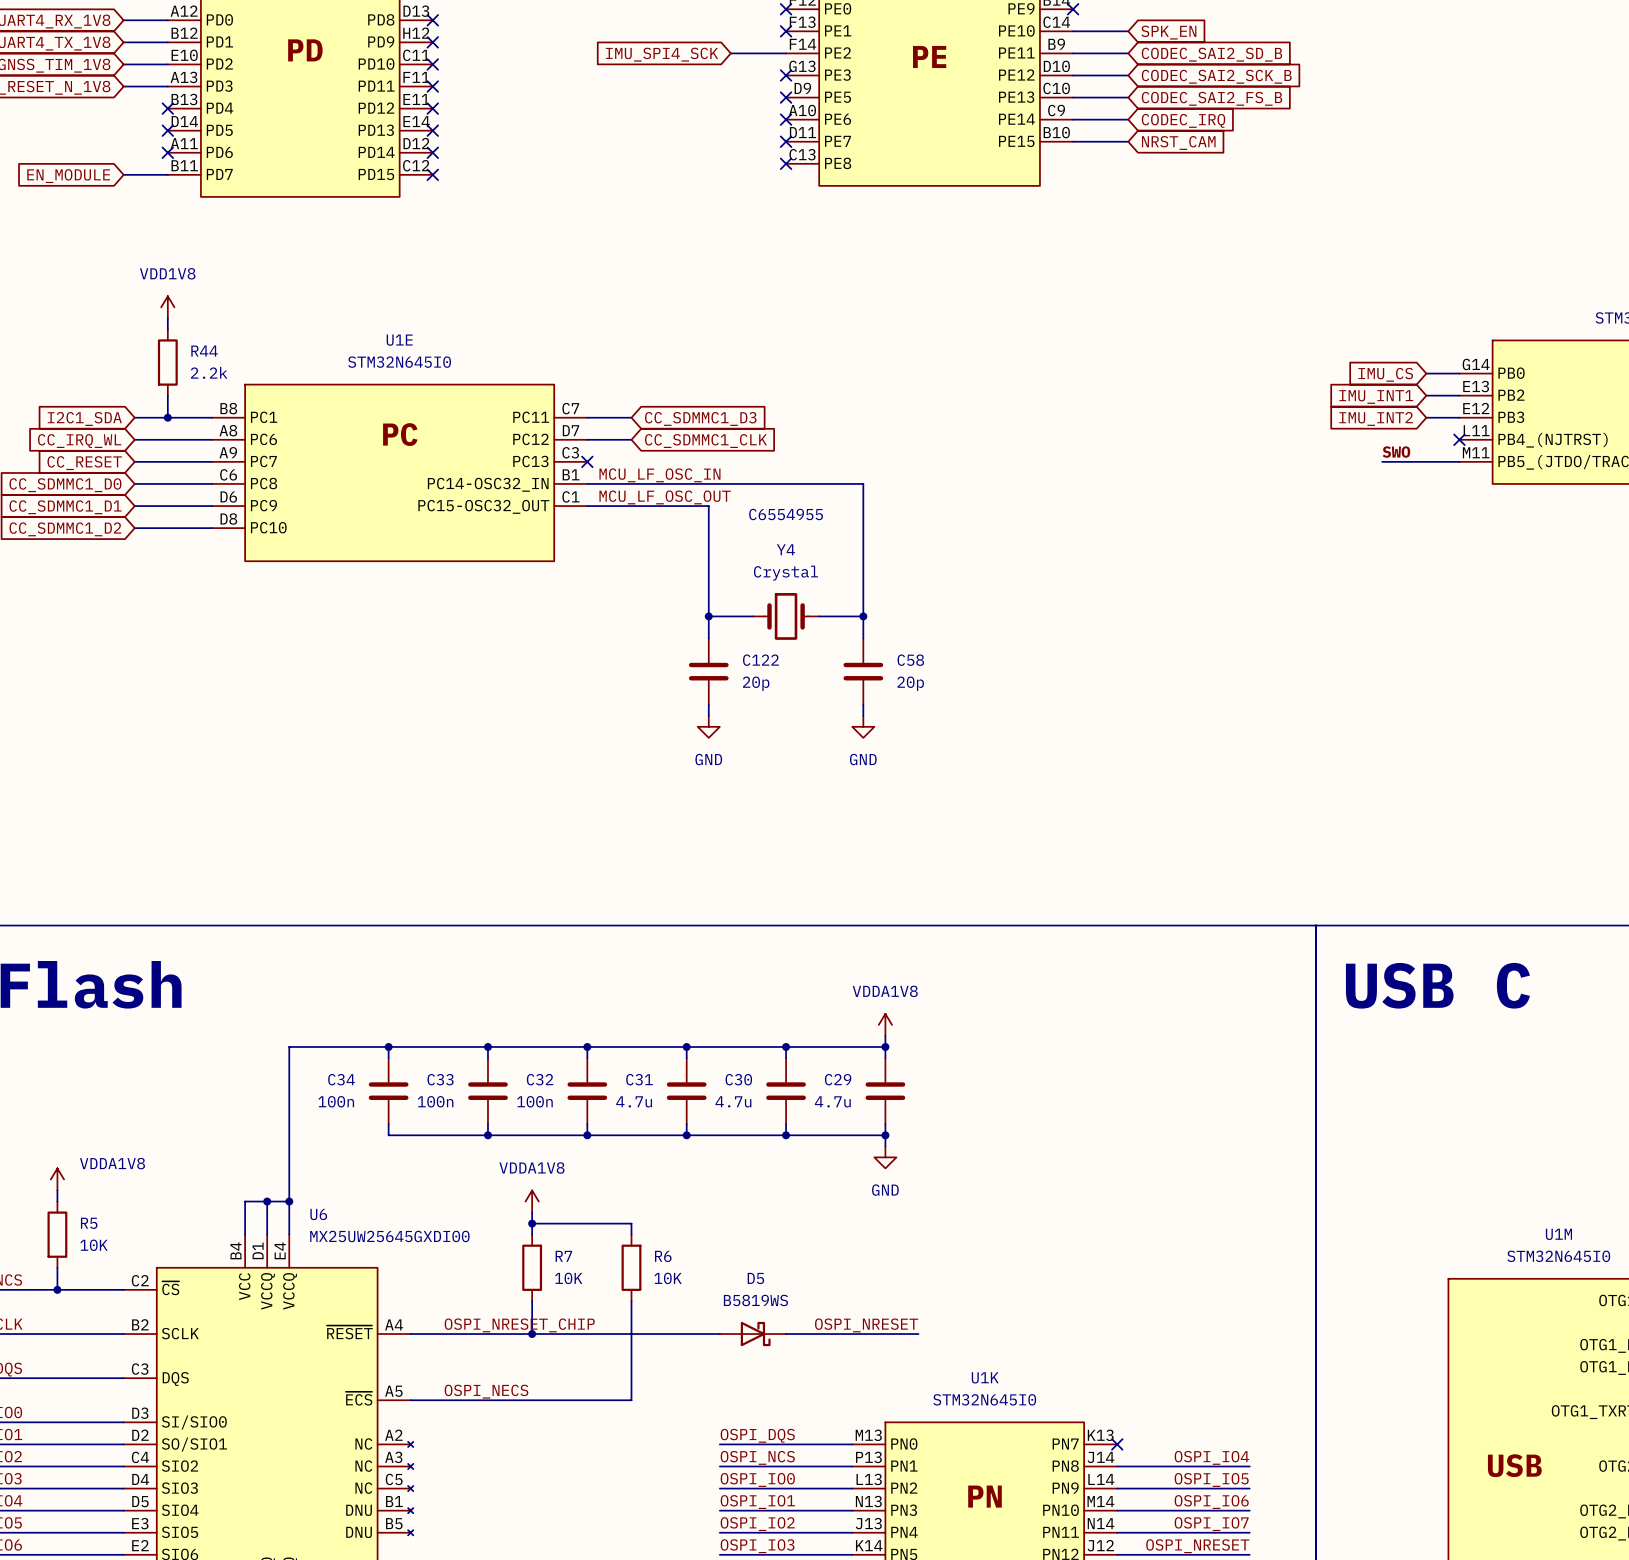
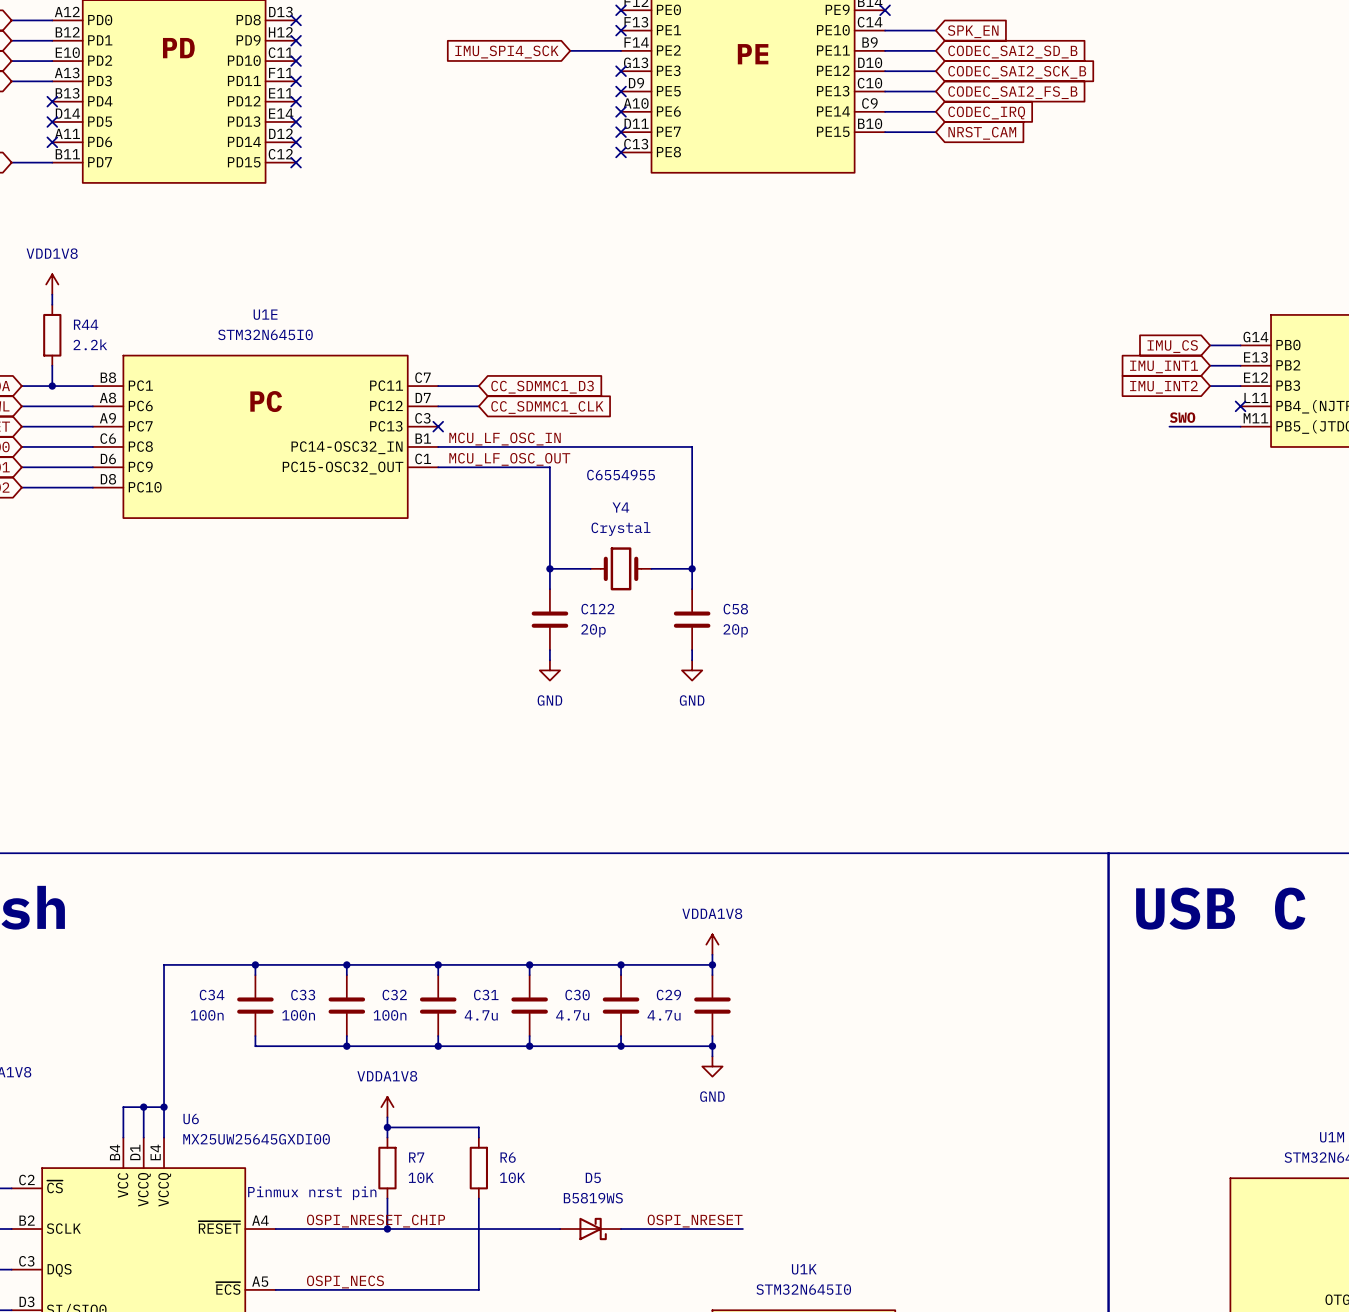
text: none -> Pinmux nrst pin (312, 1193)

